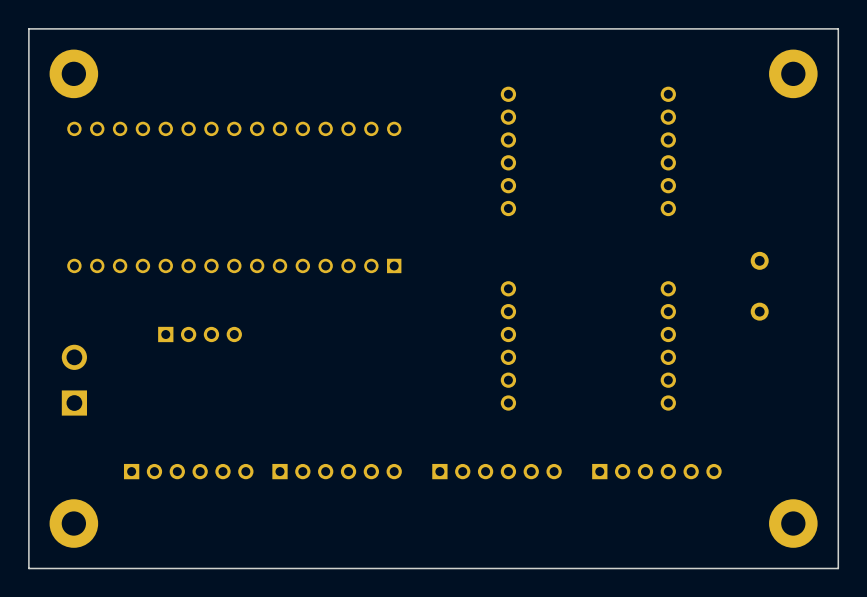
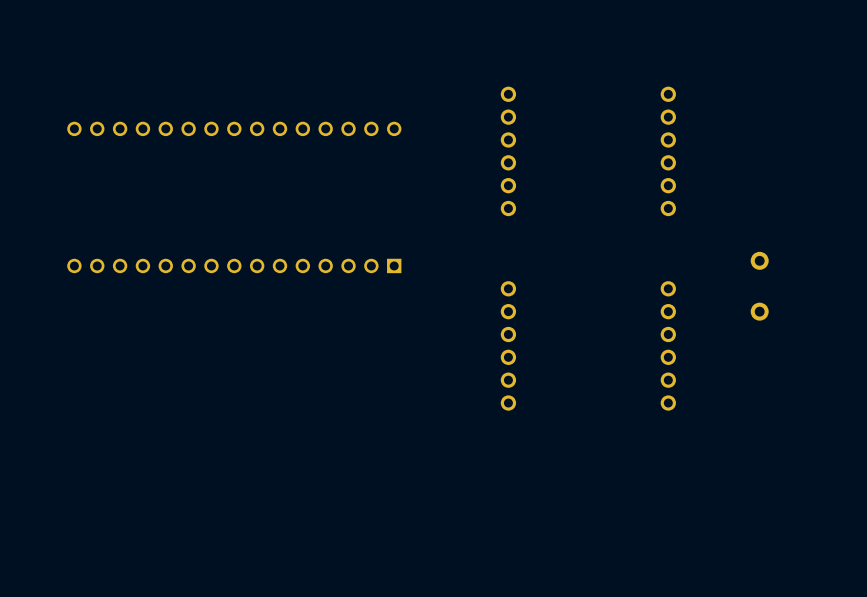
board edge: (838, 28) (28, 28) (28, 568) (838, 568) (838, 28) -> none
part: (73, 73) -> none
part: (793, 73) -> none
part: (200, 334) -> none
part: (74, 380) -> none
part: (188, 471) -> none
part: (337, 471) -> none
part: (497, 471) -> none
part: (656, 471) -> none
part: (73, 523) -> none
part: (793, 523) -> none

